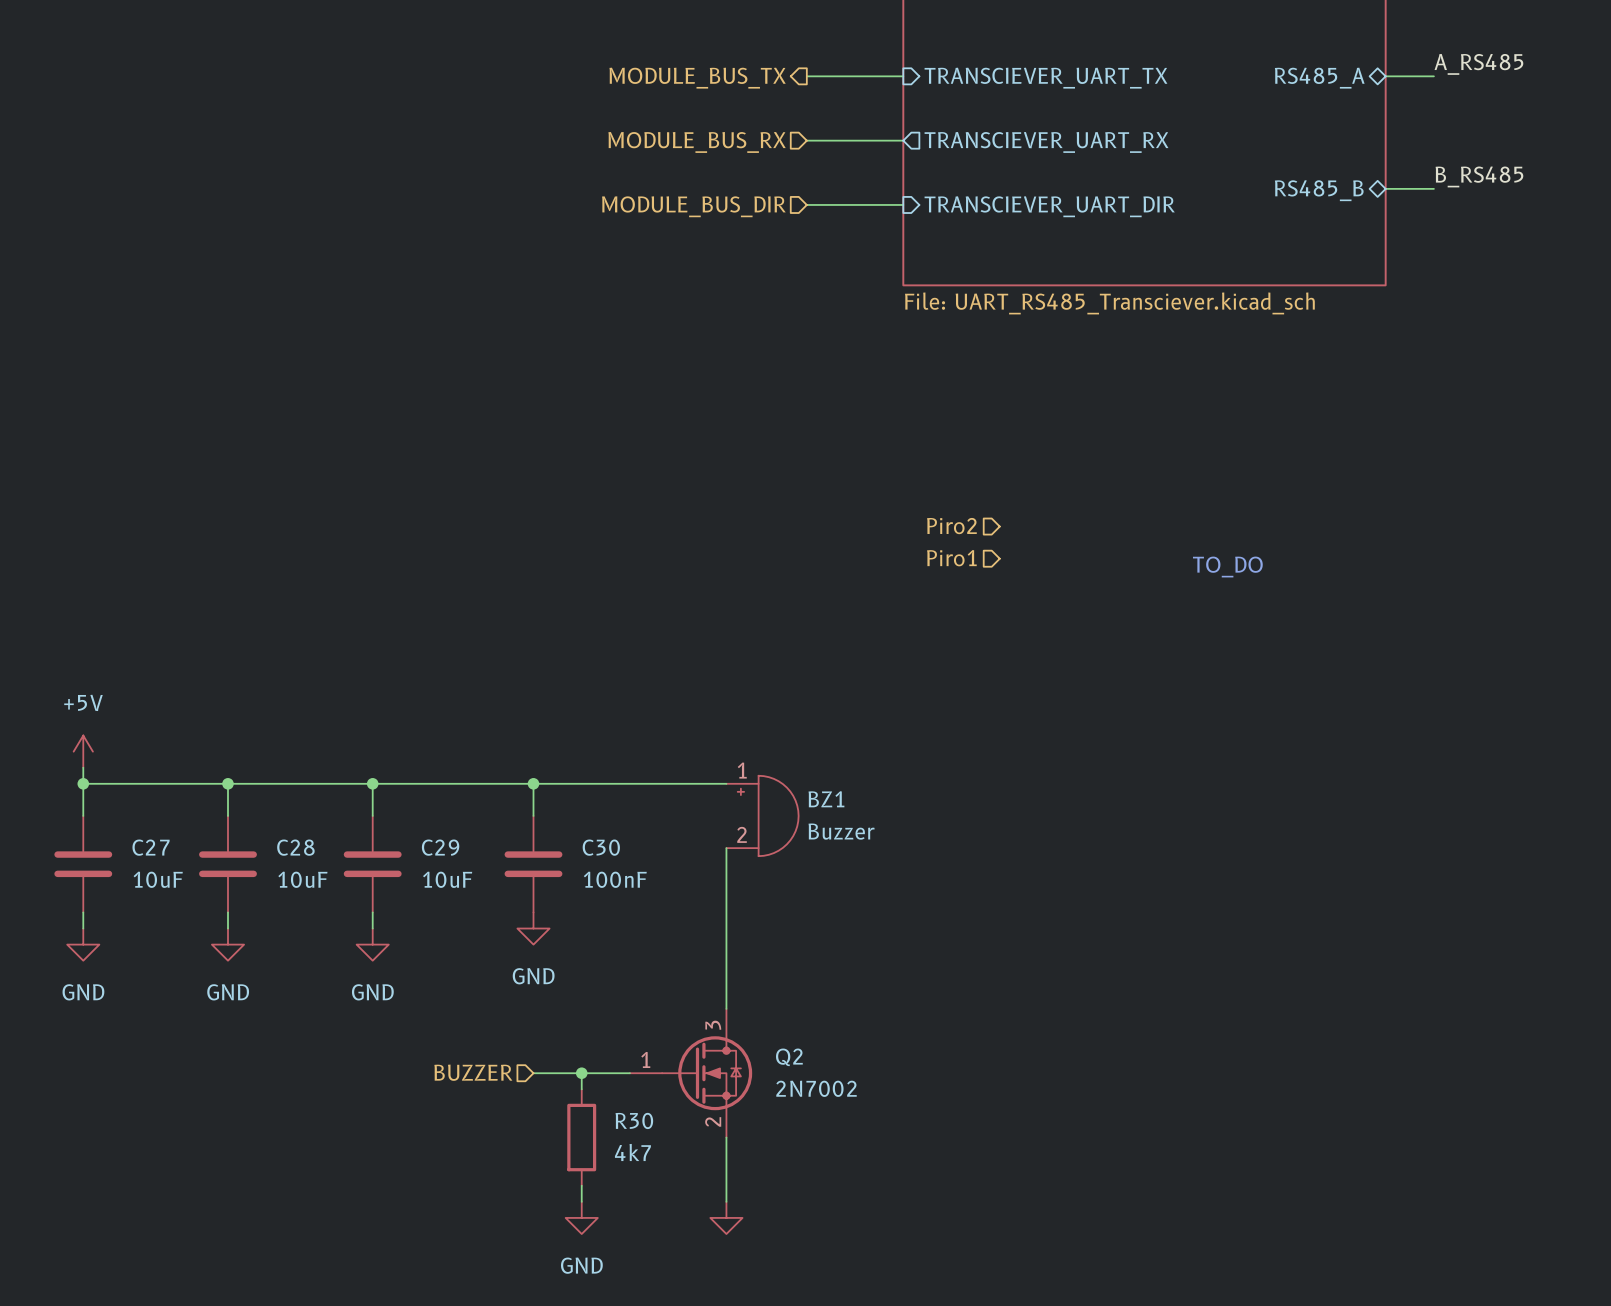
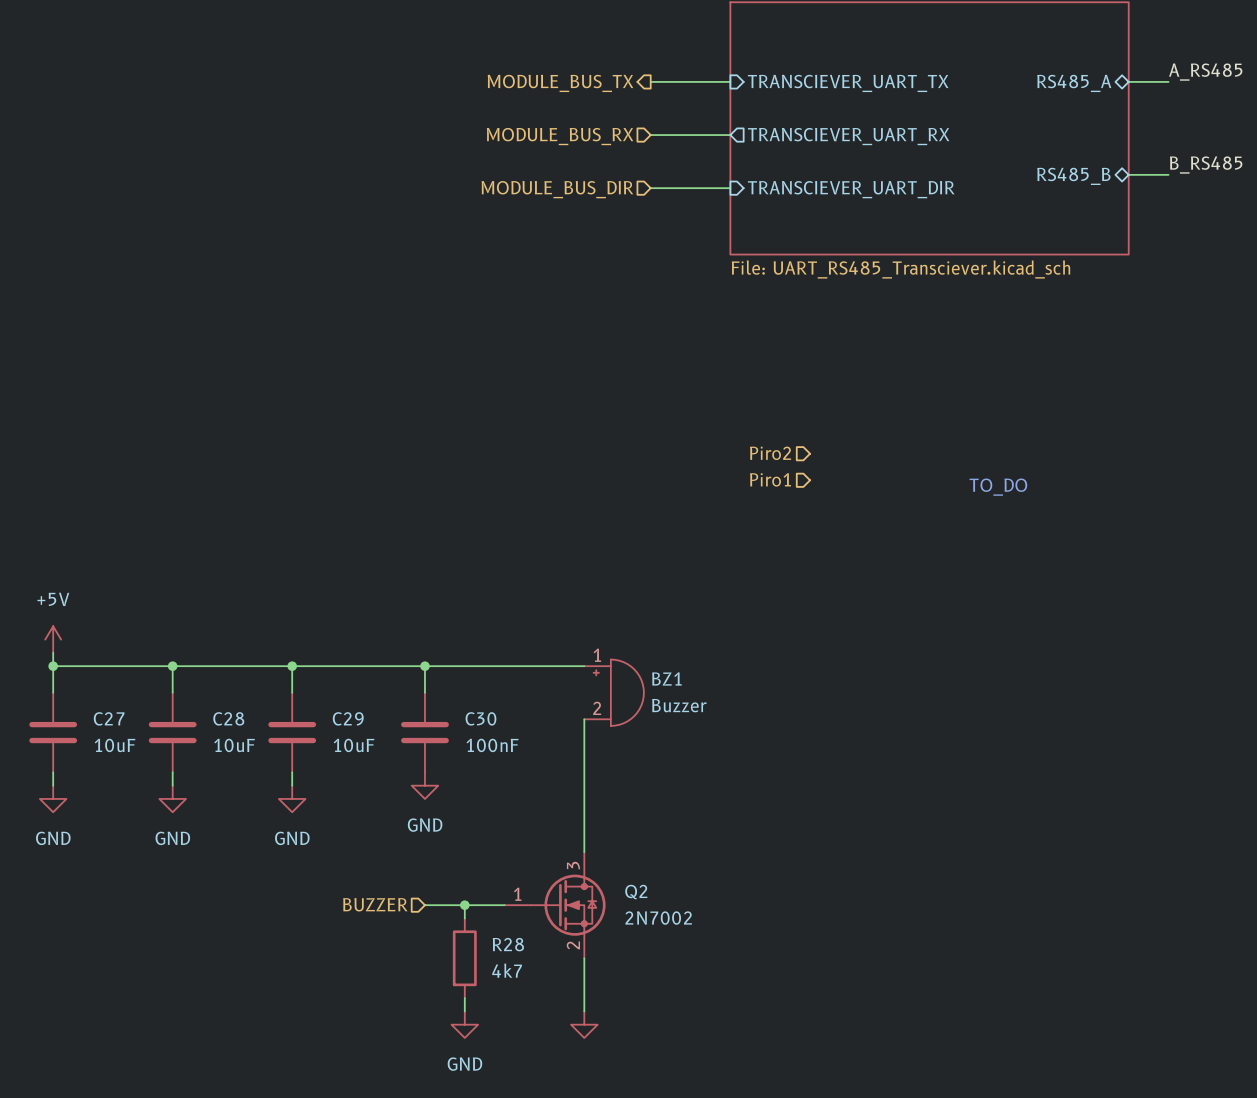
R30 name: R30 (634, 1120) -> R28 (508, 944)

